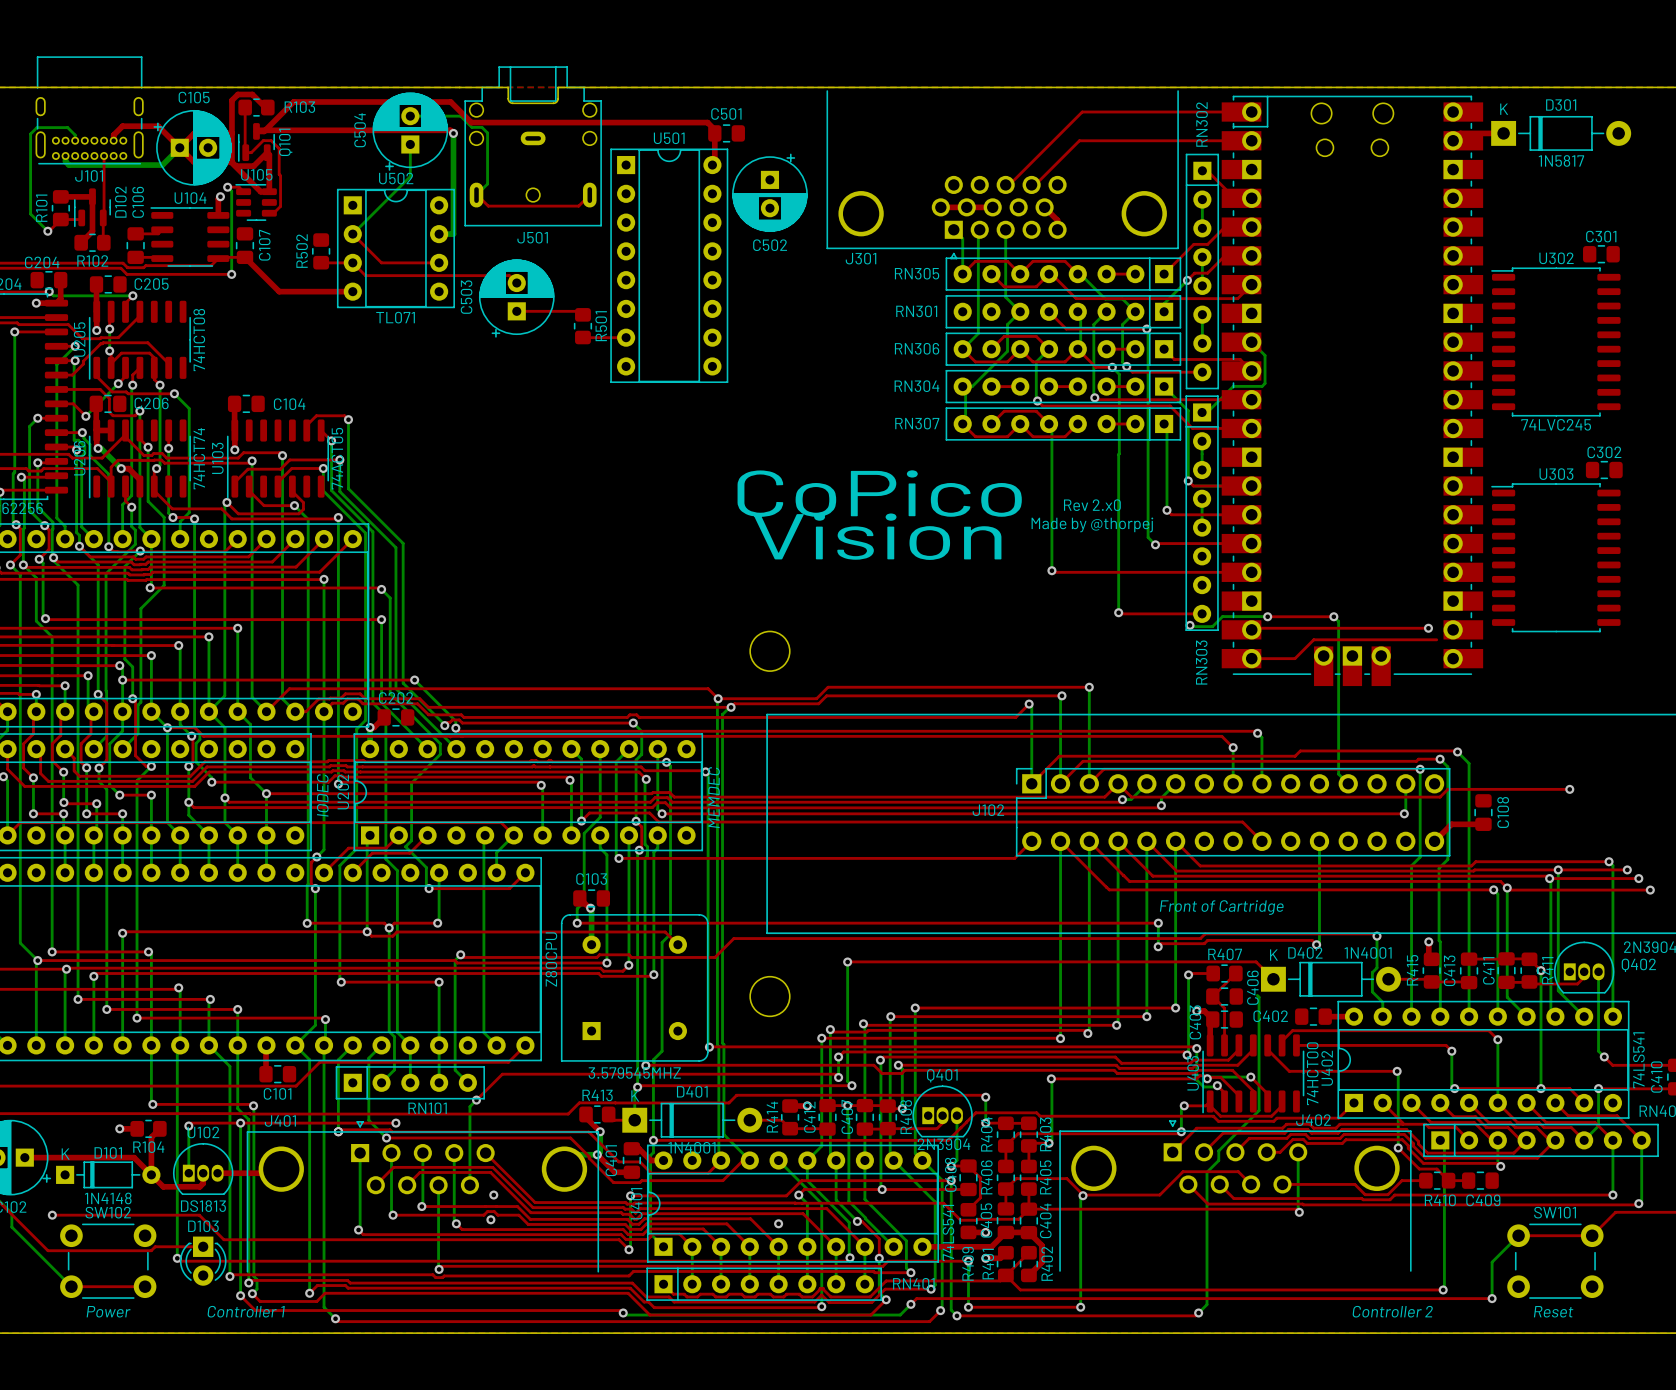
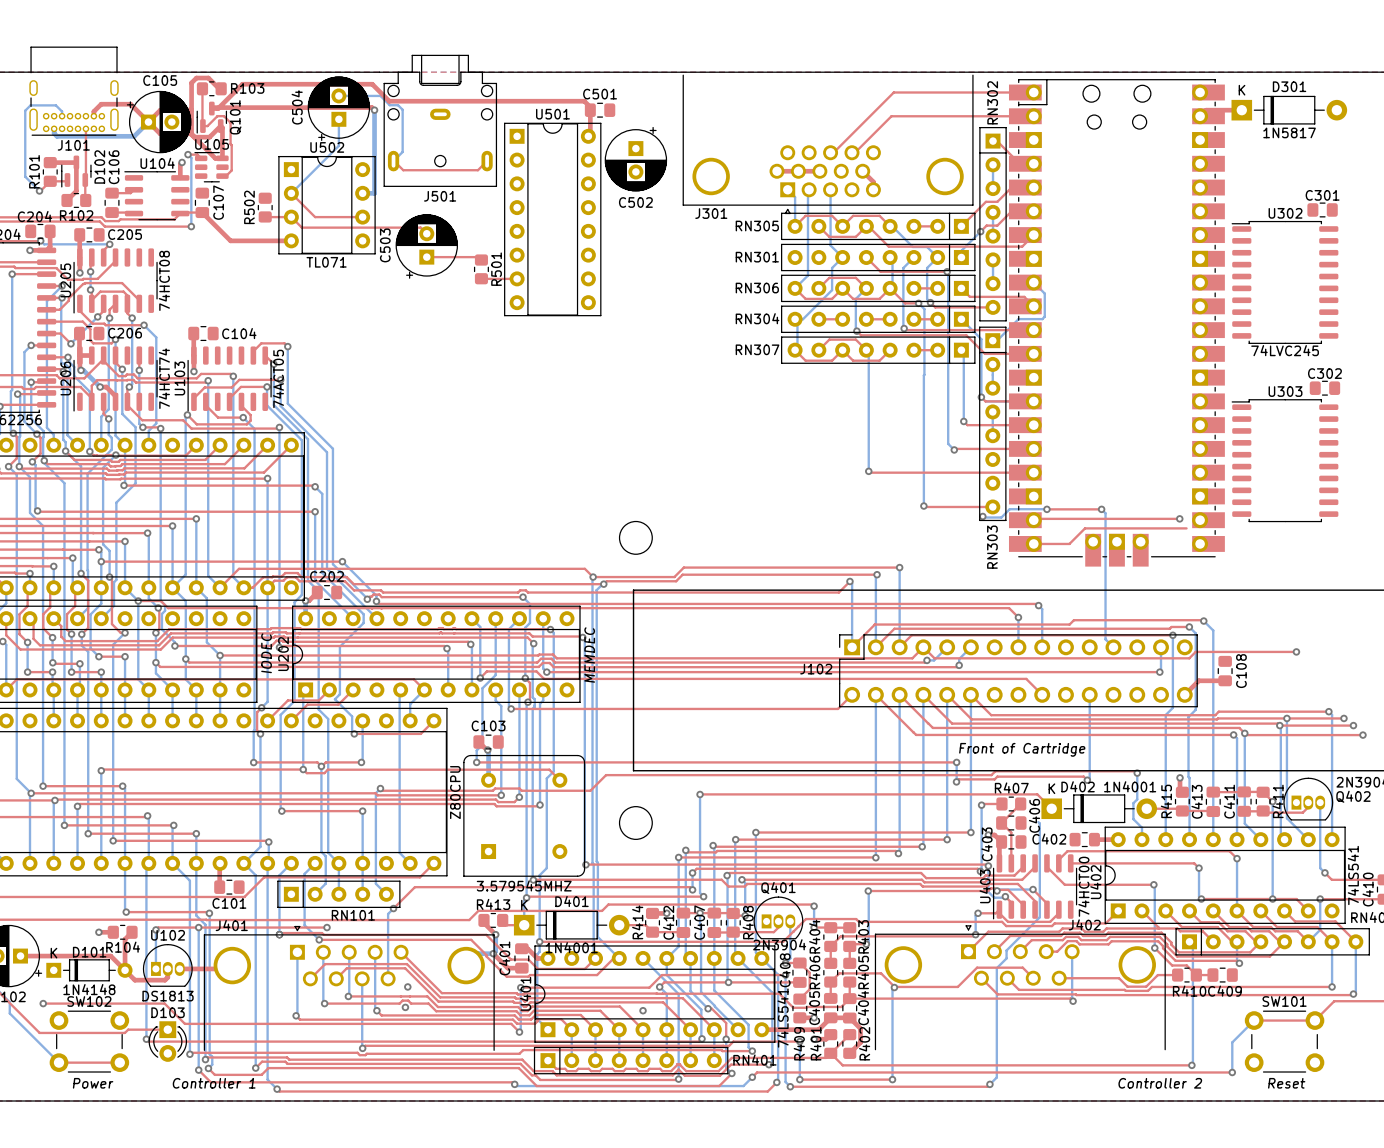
text: CoPico (879, 493) -> none
text: Rev 2.x0 (1092, 505) -> none
text: Made by @thorpej (1092, 524) -> none
text: Vision (877, 536) -> none

